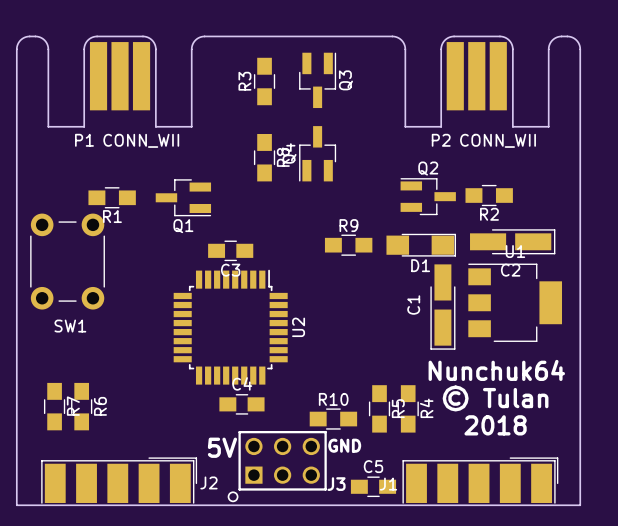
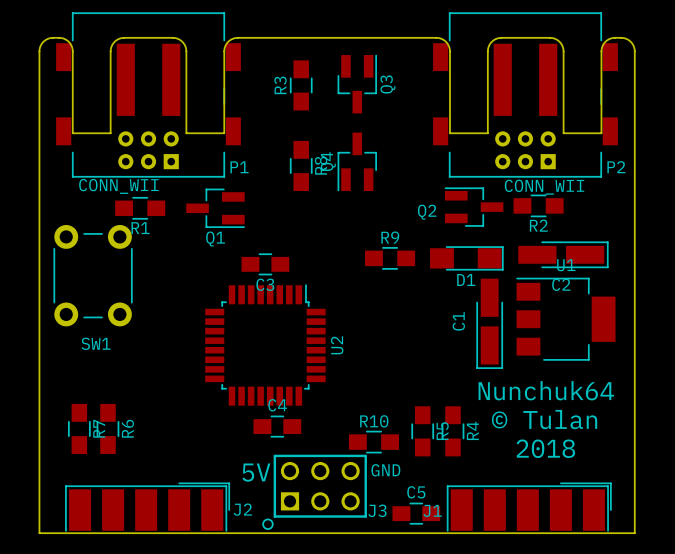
P1 footprint: [89, 42, 151, 111] -> [56, 12, 241, 178]
P2 footprint: [446, 42, 507, 111] -> [433, 12, 618, 178]
P1 name position: P1 (84, 140) -> P1 (239, 167)
P1 value position: CONN_WII (141, 140) -> CONN_WII (118, 186)
P2 name position: P2 (441, 140) -> P2 (616, 167)
Q2 name position: Q2 (428, 168) -> Q2 (427, 212)

